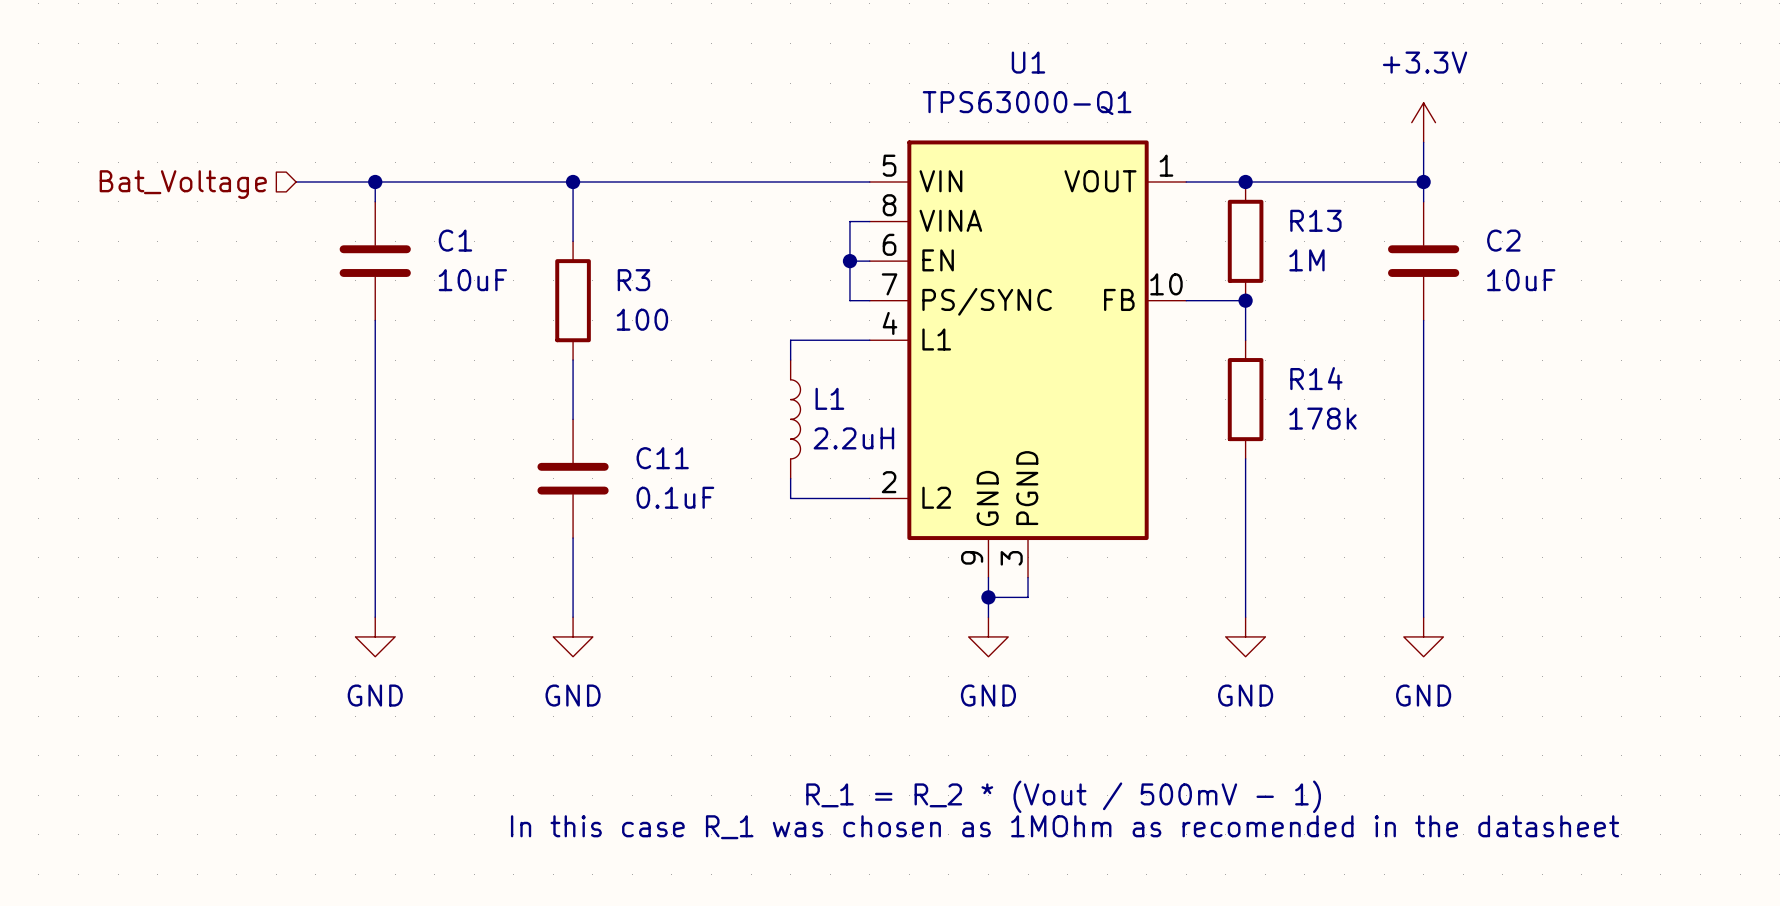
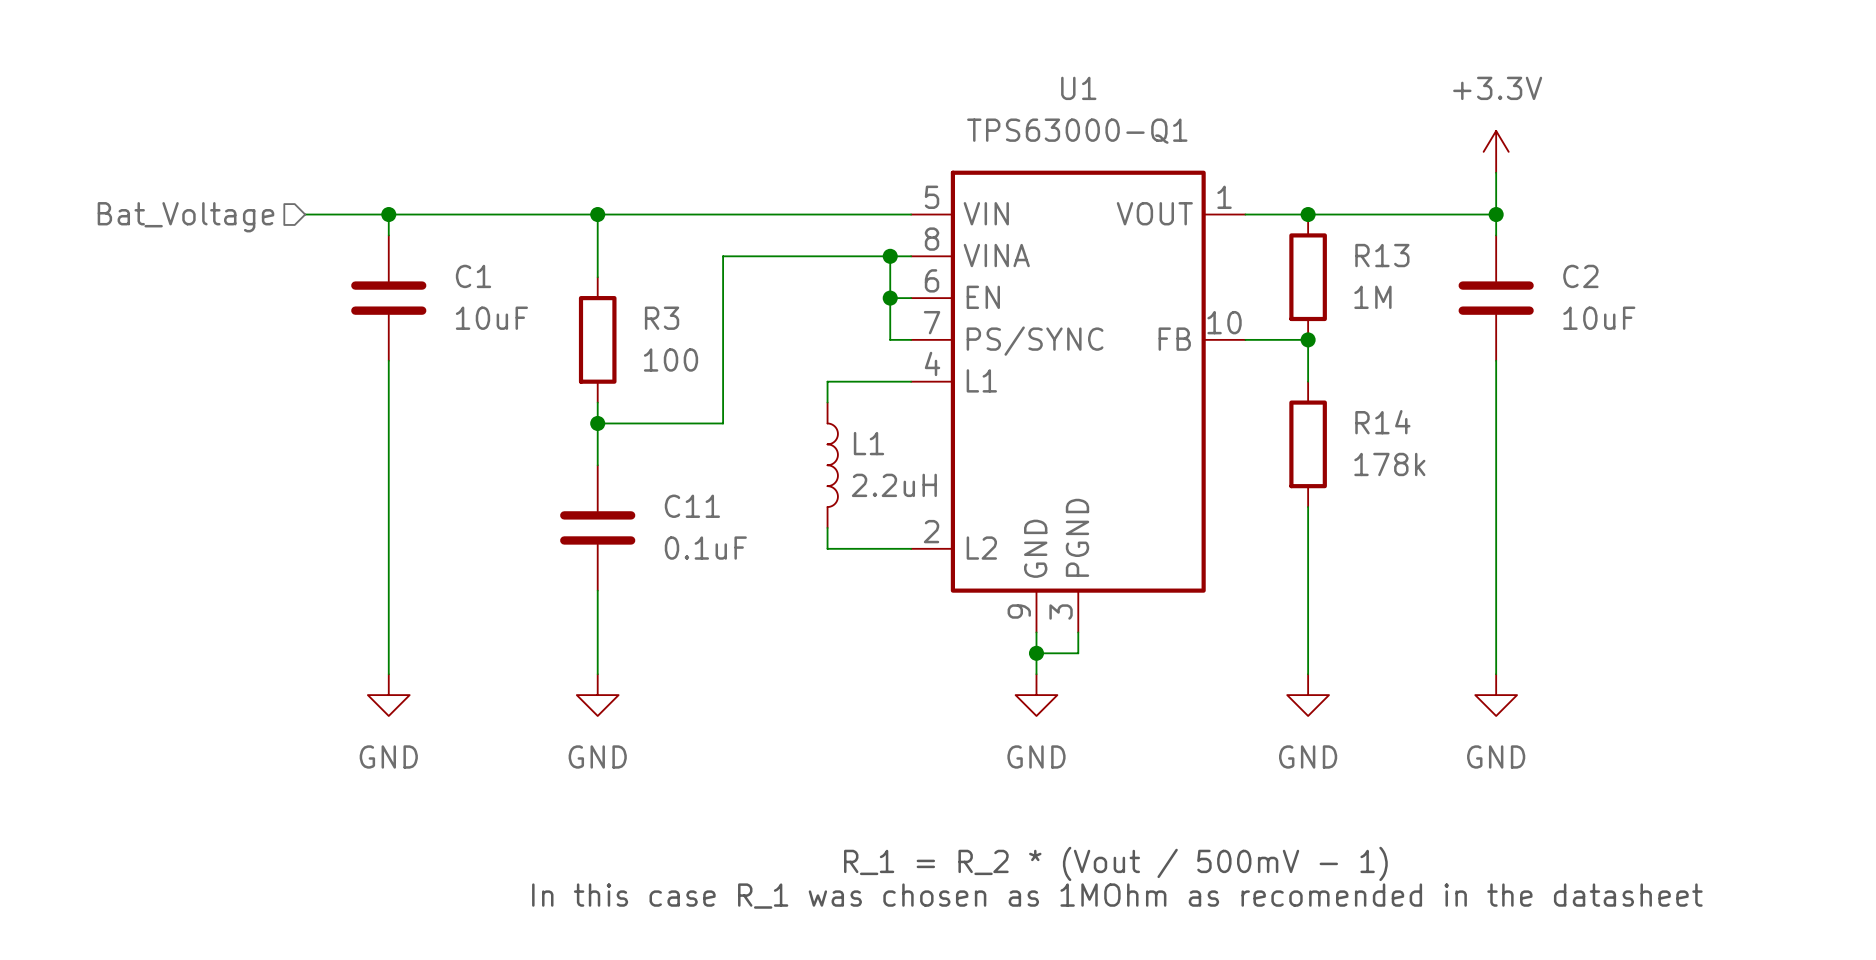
wire: none -> (890, 256) (723, 256) (723, 423) (597, 423)
junction: none -> (890, 256)
junction: none -> (597, 423)

